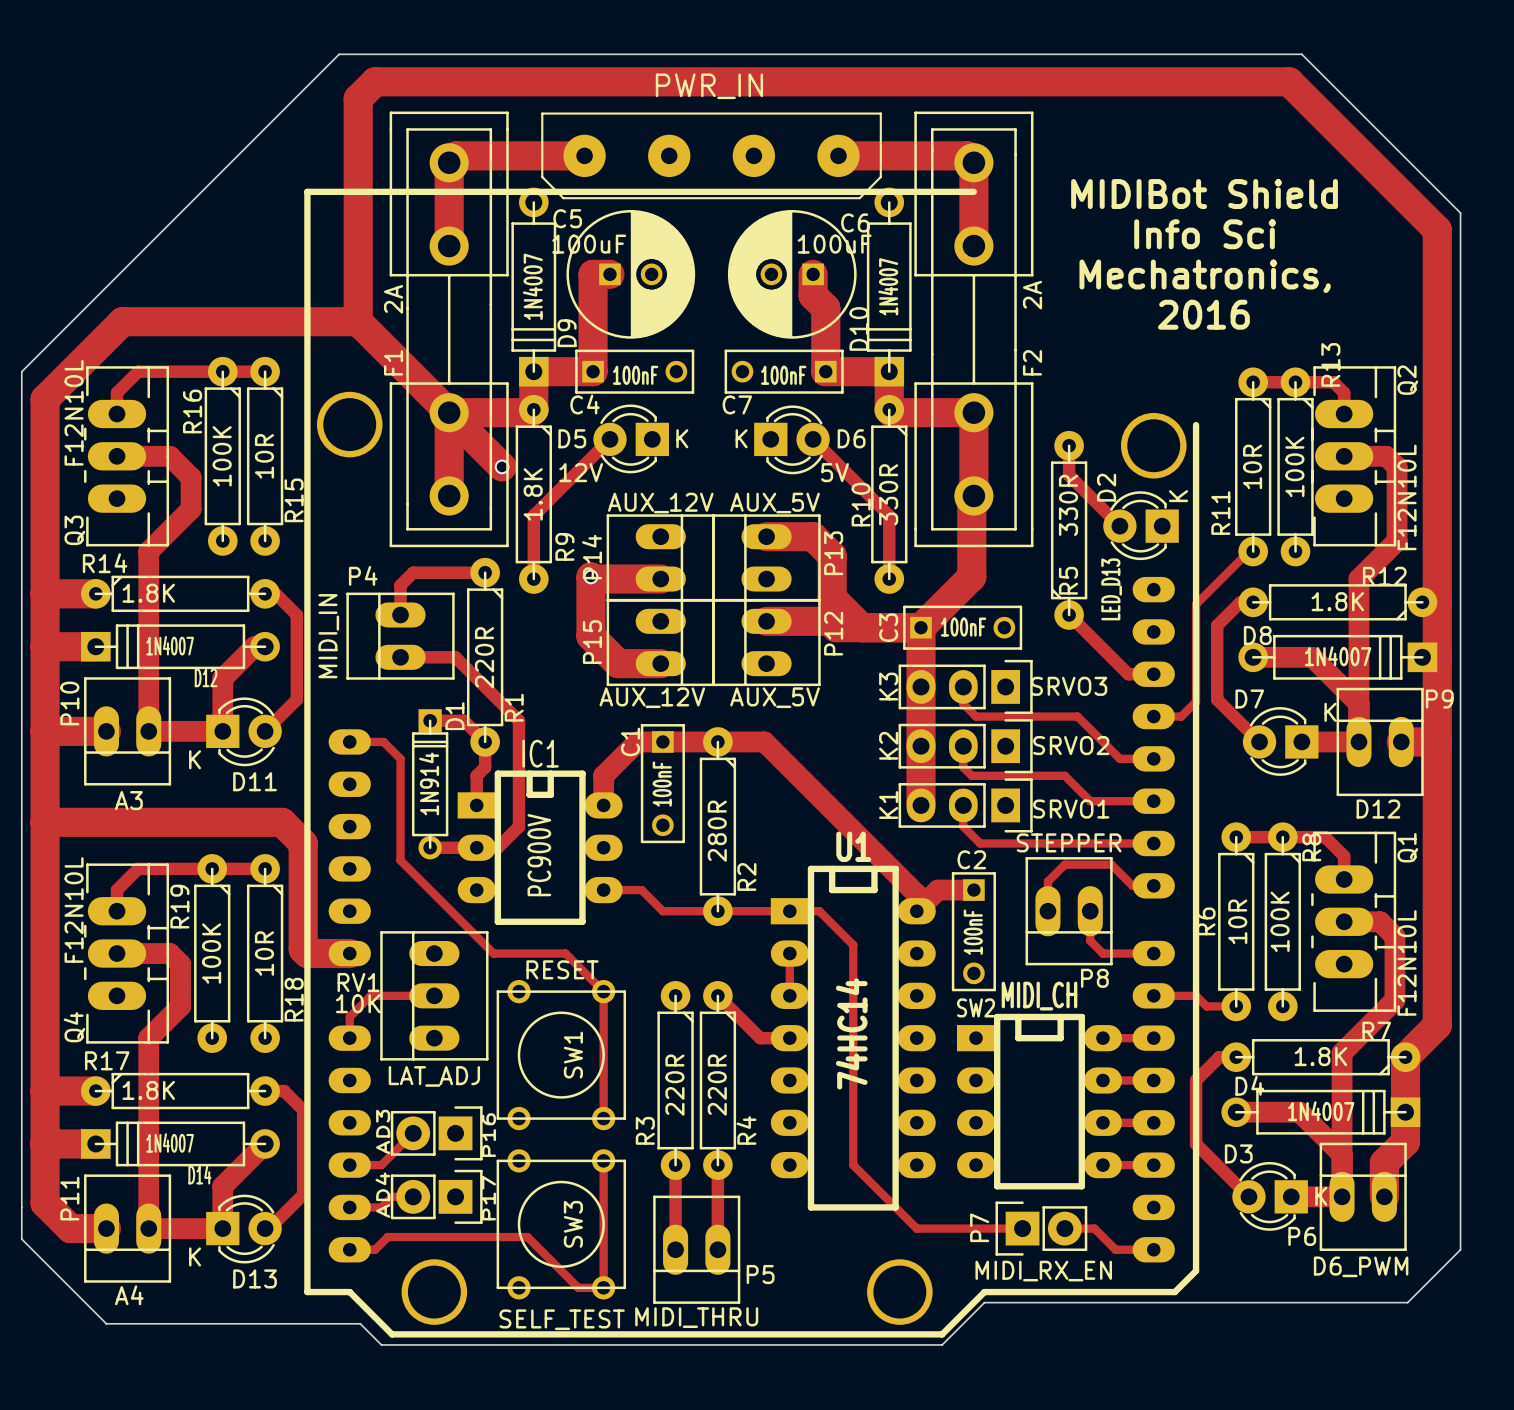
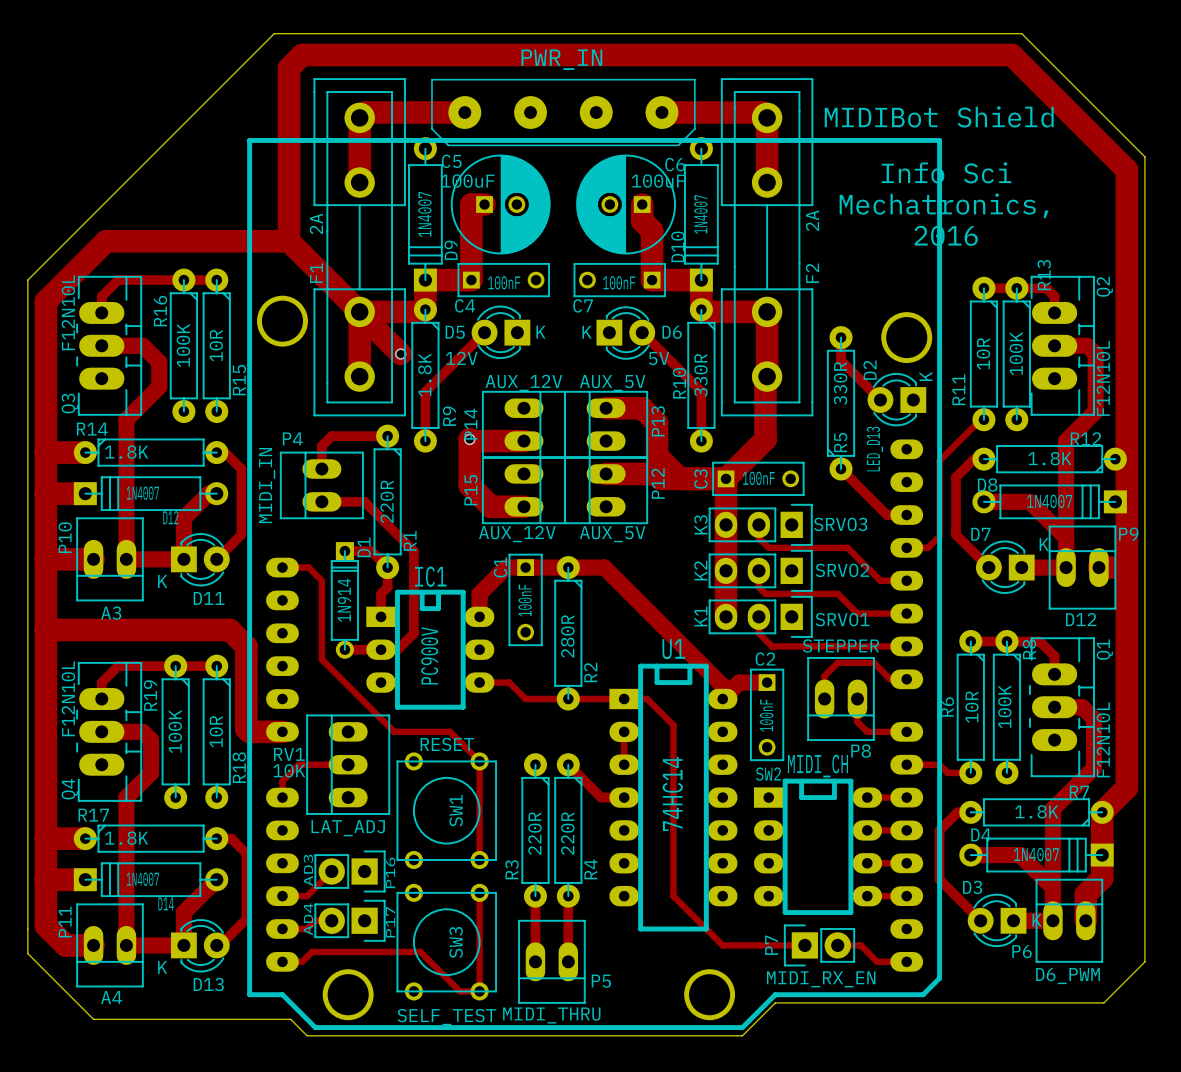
part footprint: [304, 188, 1200, 1338] -> [247, 137, 943, 1031]
text position: MIDIBot Shield (1204, 194) -> MIDIBot Shield (939, 116)

